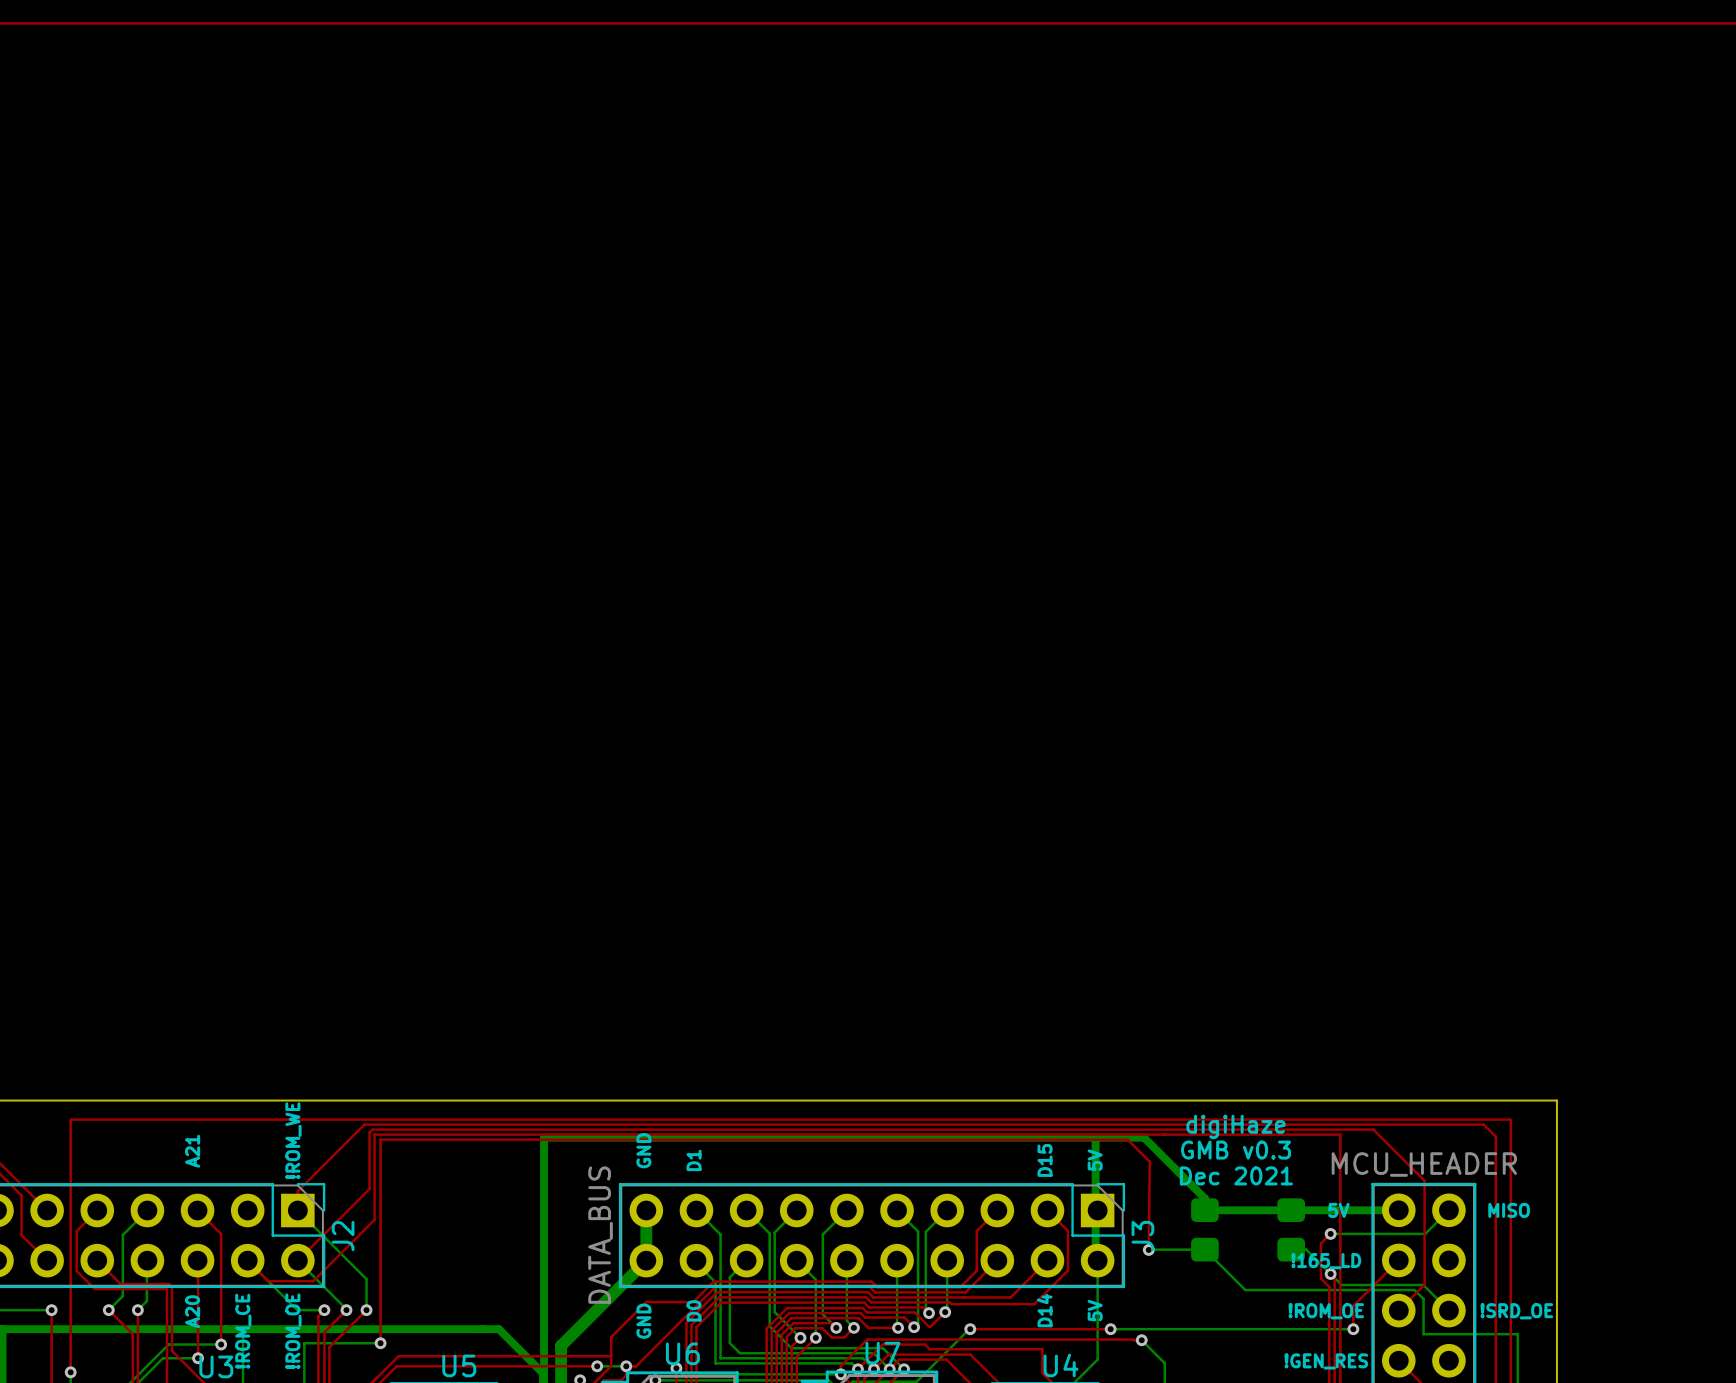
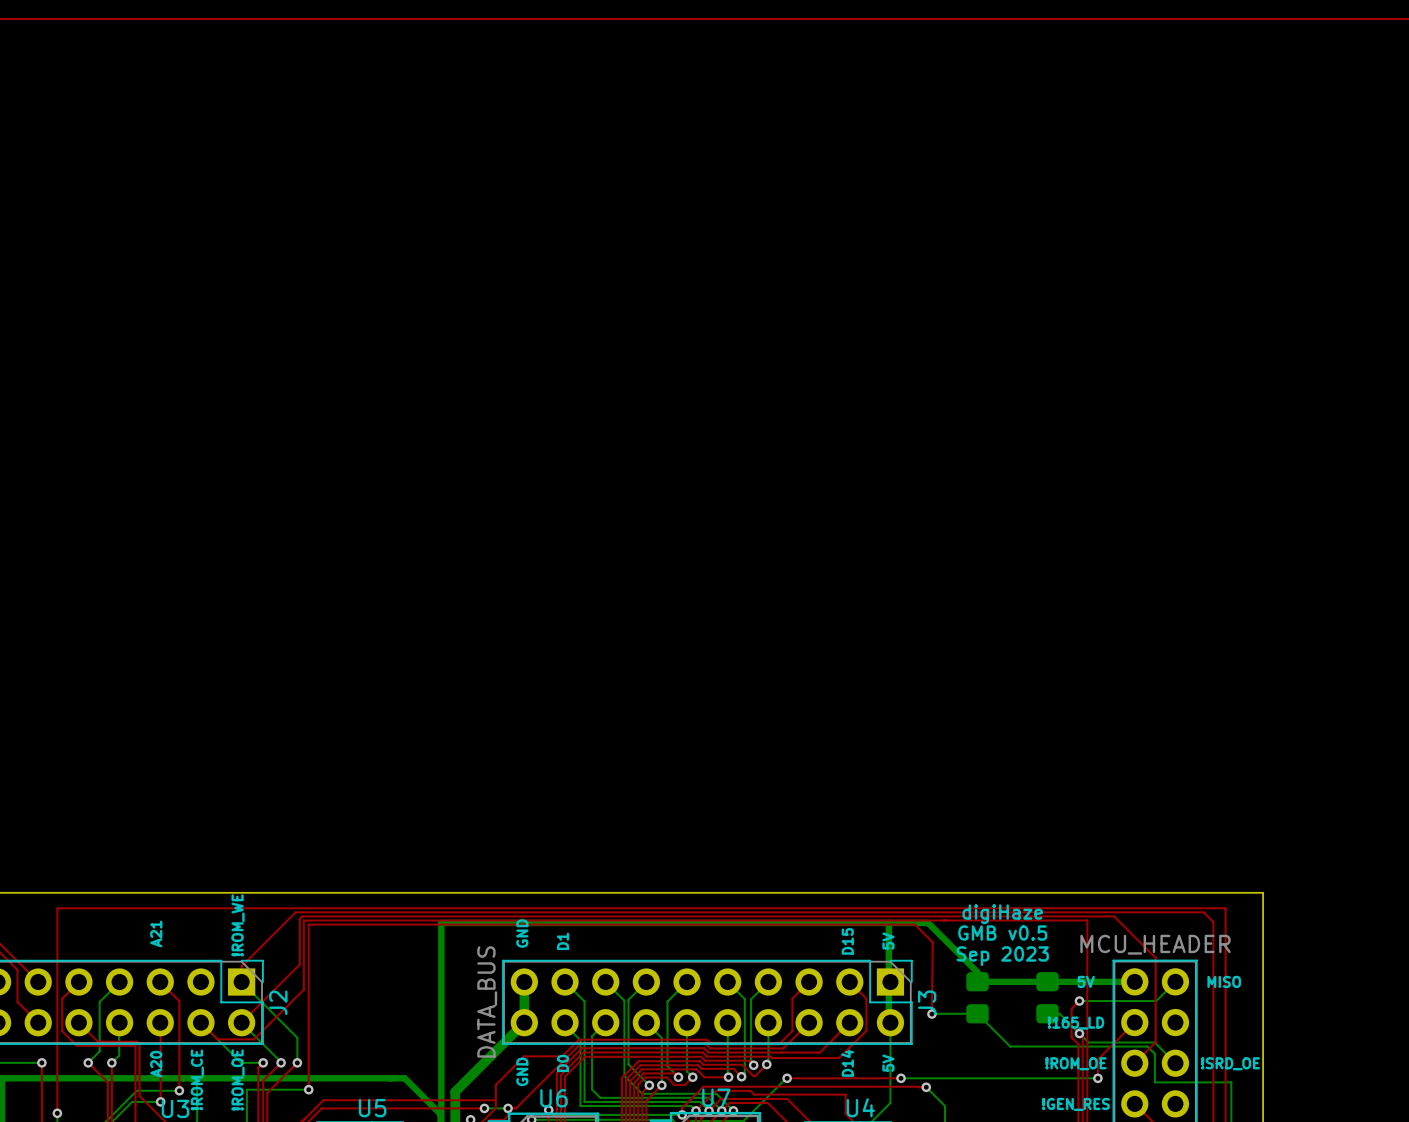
text: GMB v0.3 (1236, 1150) -> GMB v0.5 (1002, 933)
text: Dec 2021 (1236, 1175) -> Sep 2023 (1002, 956)

